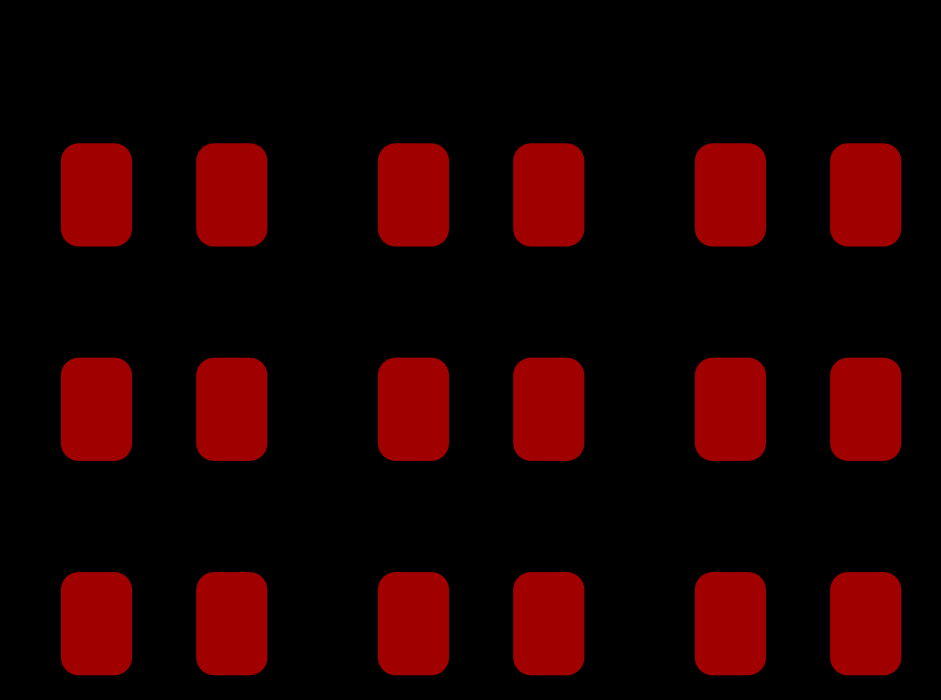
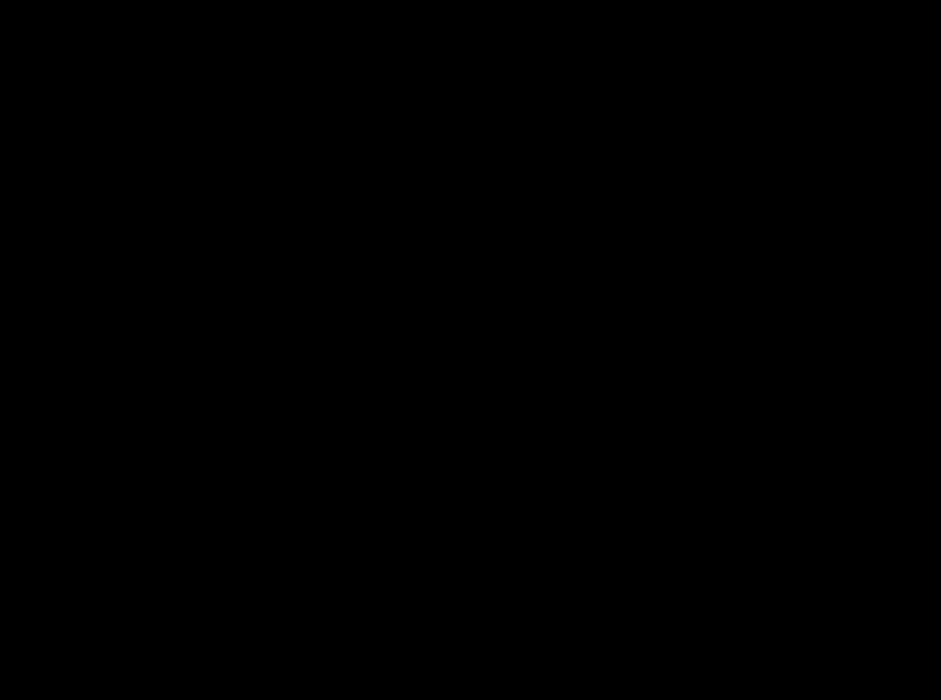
part: (164, 194) -> none
part: (481, 194) -> none
part: (798, 194) -> none
part: (164, 409) -> none
part: (481, 409) -> none
part: (798, 409) -> none
part: (164, 623) -> none
part: (481, 623) -> none
part: (798, 623) -> none

